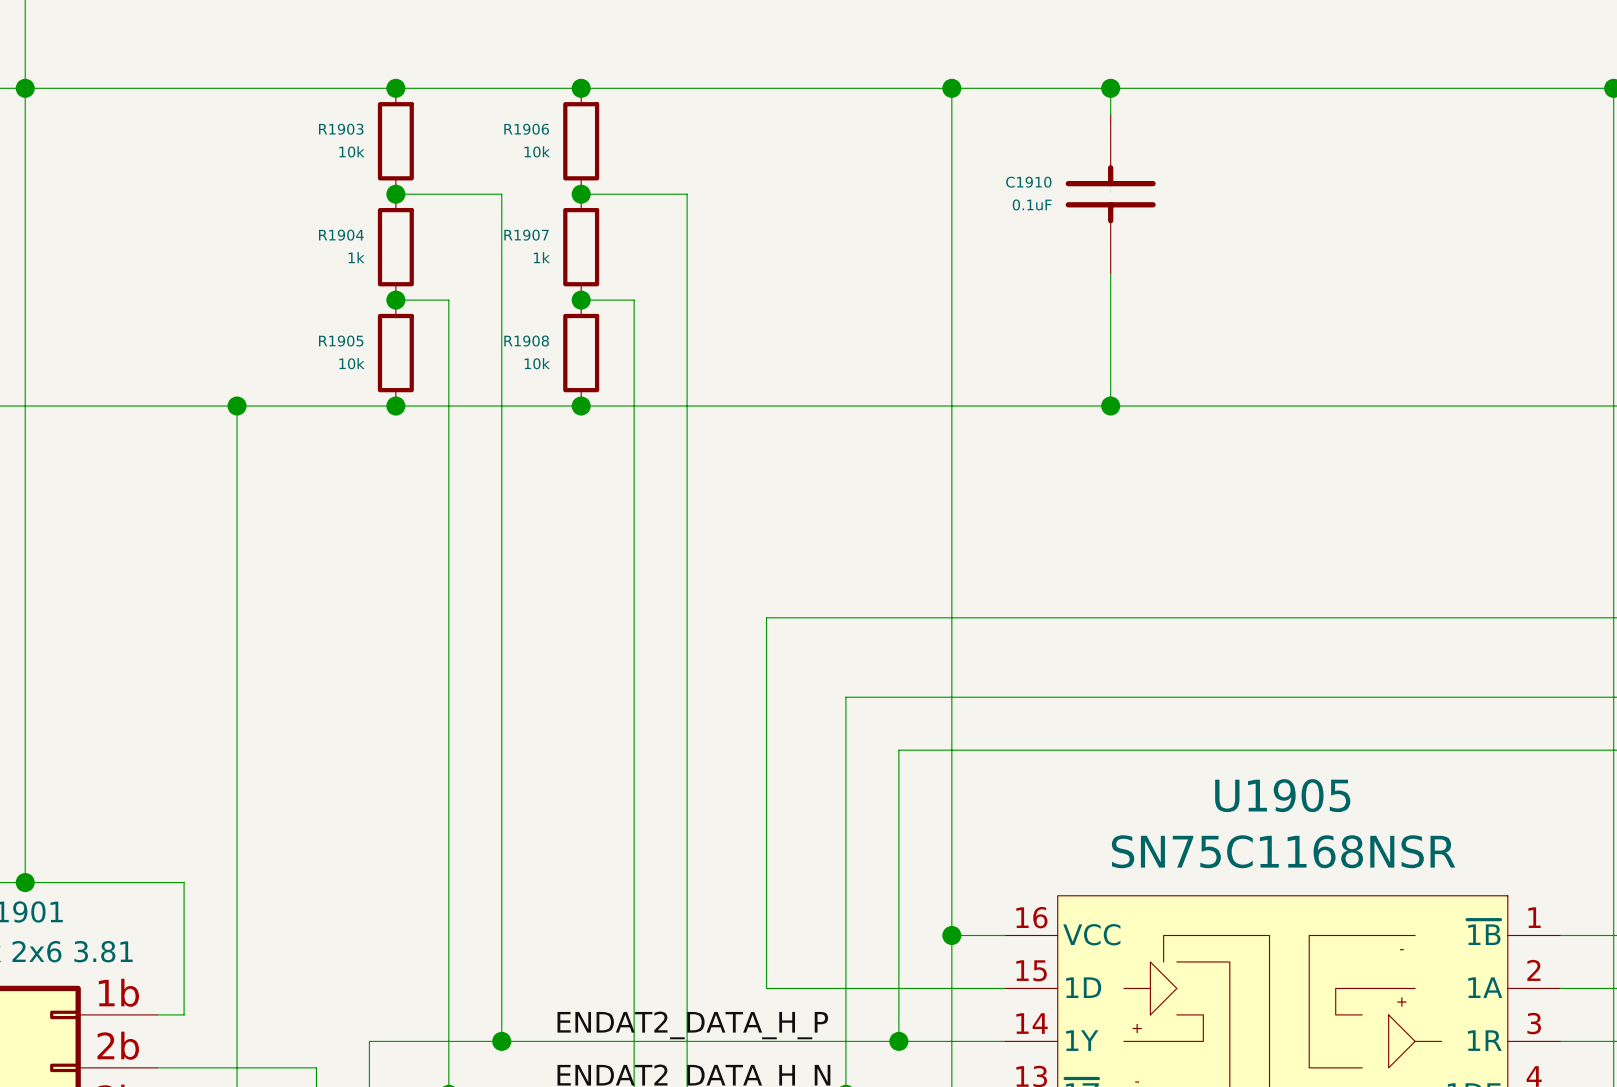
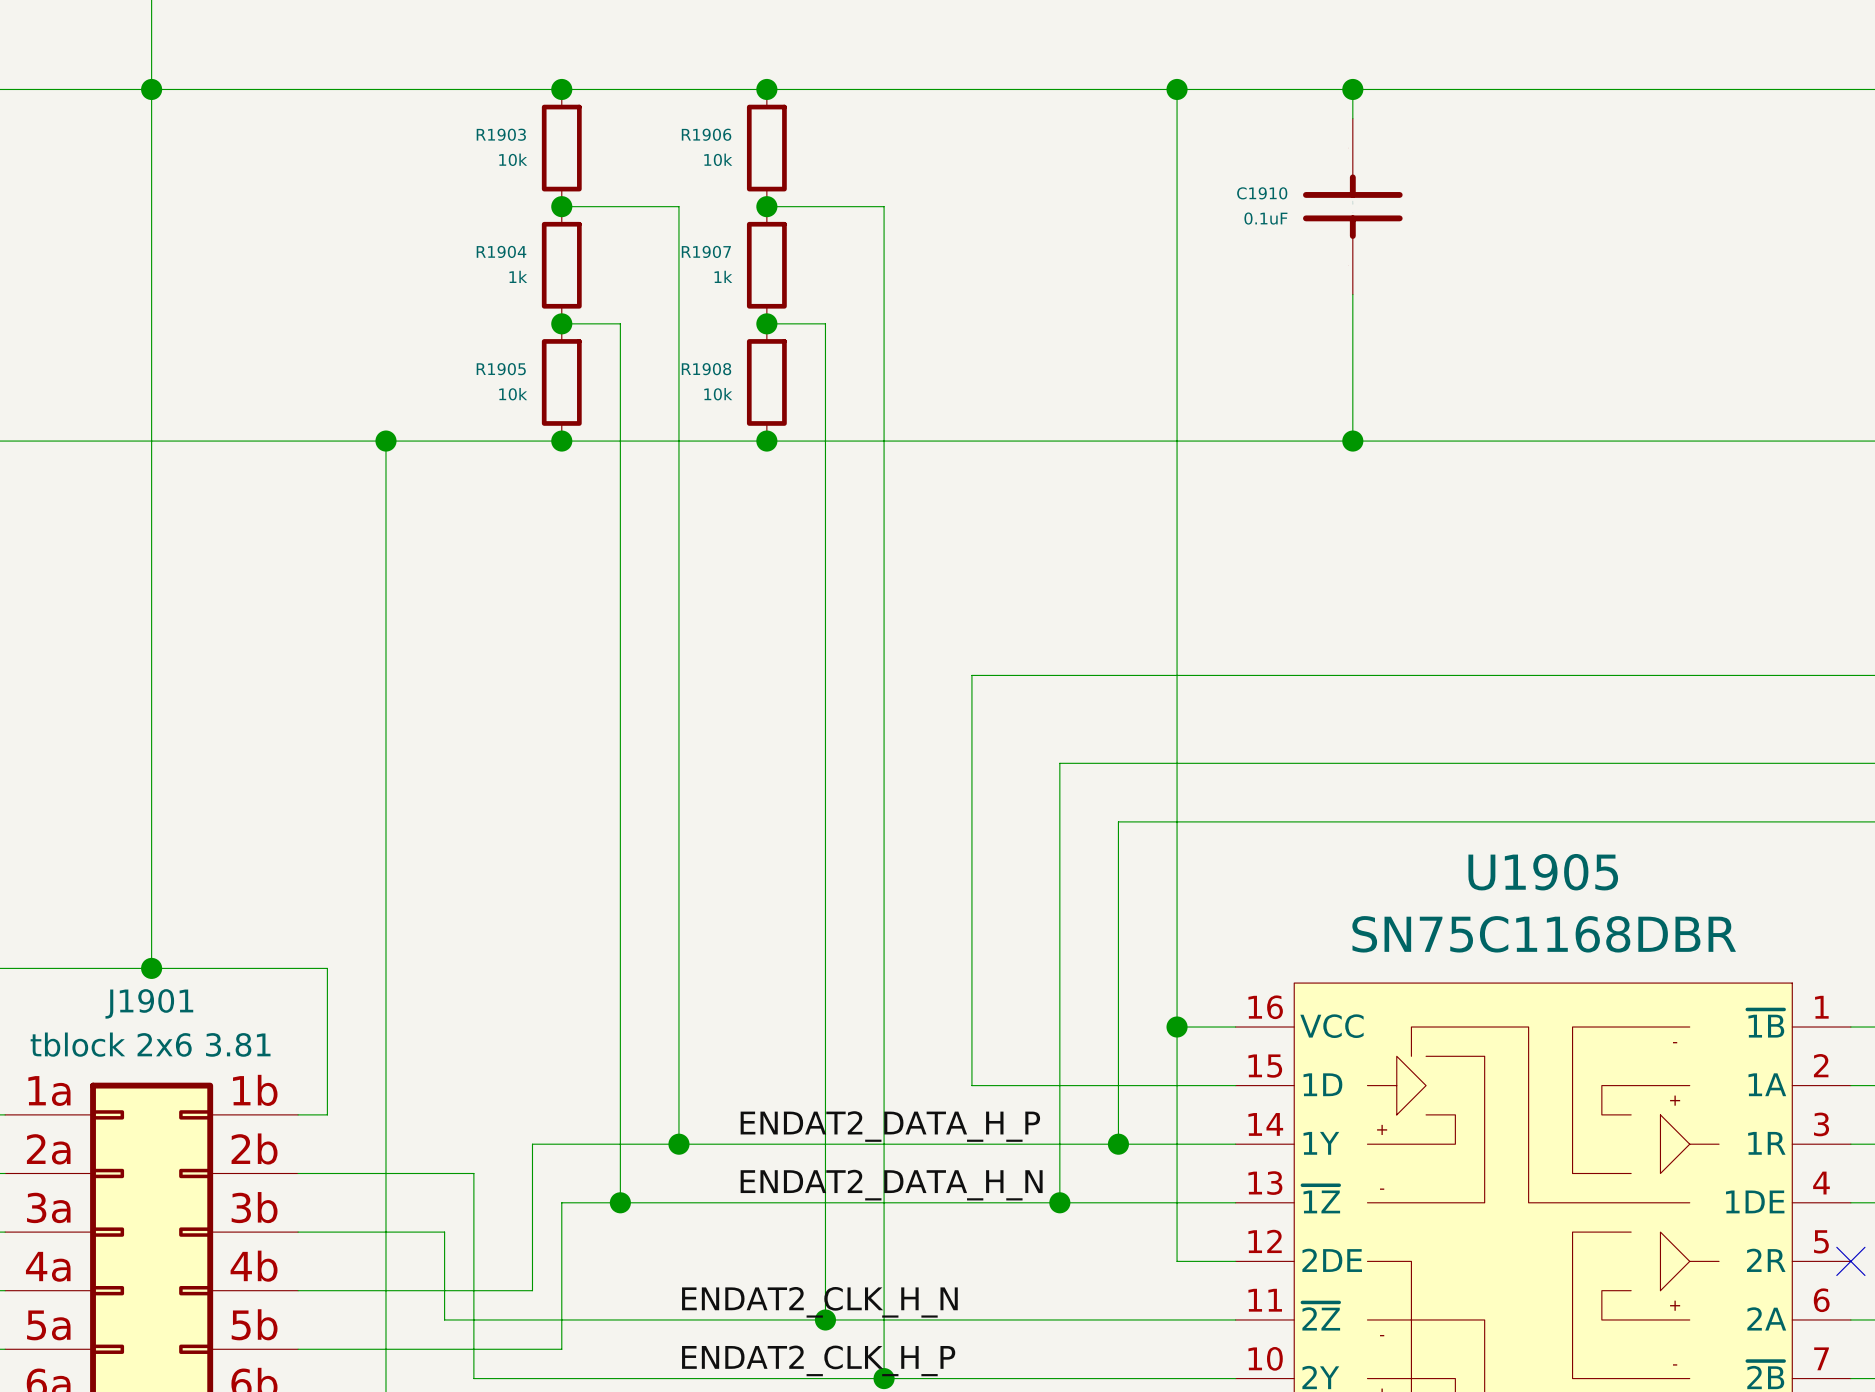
U1905 value: SN75C1168NSR (1283, 851) -> SN75C1168DBR (1544, 934)

